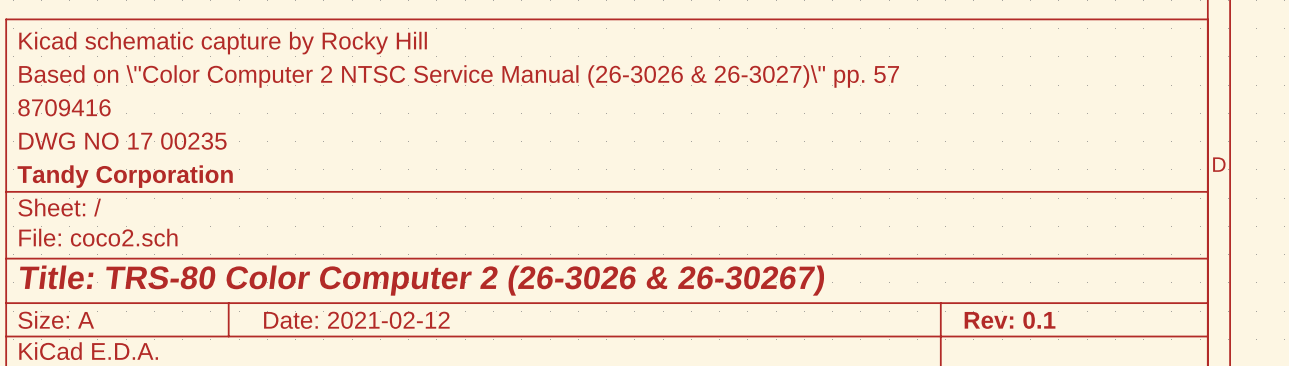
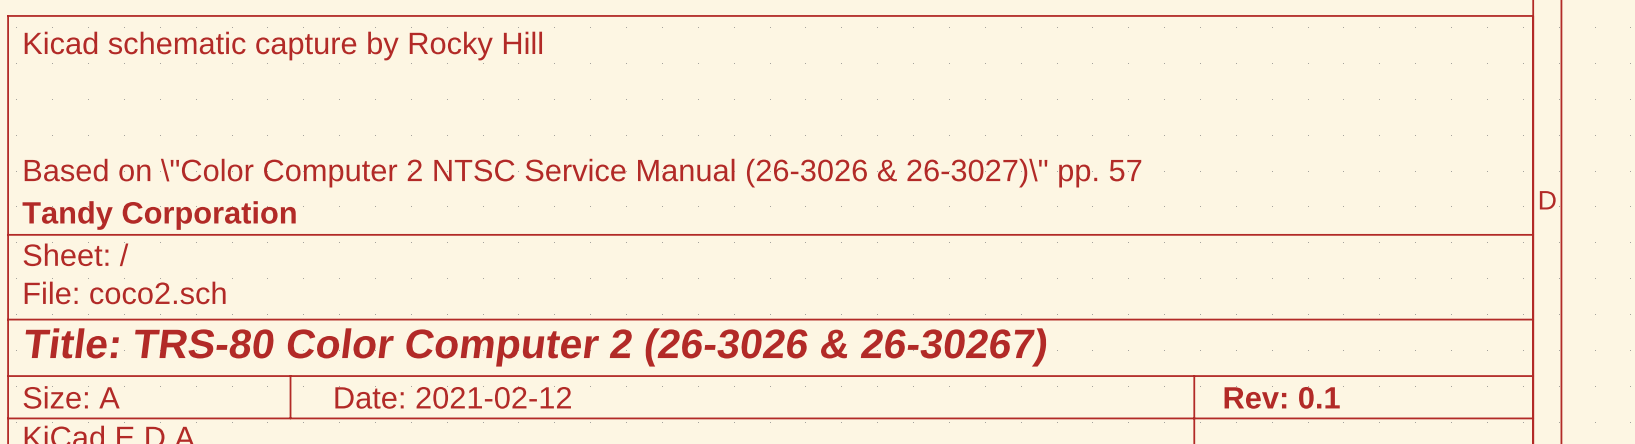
title block: Based on \"Color Computer 2 NTSC Service Manual (26-3026 & 26-3027)\" pp. 57 (459, 76) -> none
title block: 8709416 (64, 107) -> none
title block: DWG NO 17 00235 (122, 141) -> Based on \"Color Computer 2 NTSC Service Manual (26-3026 & 26-3027)\" pp. 57 (582, 173)

